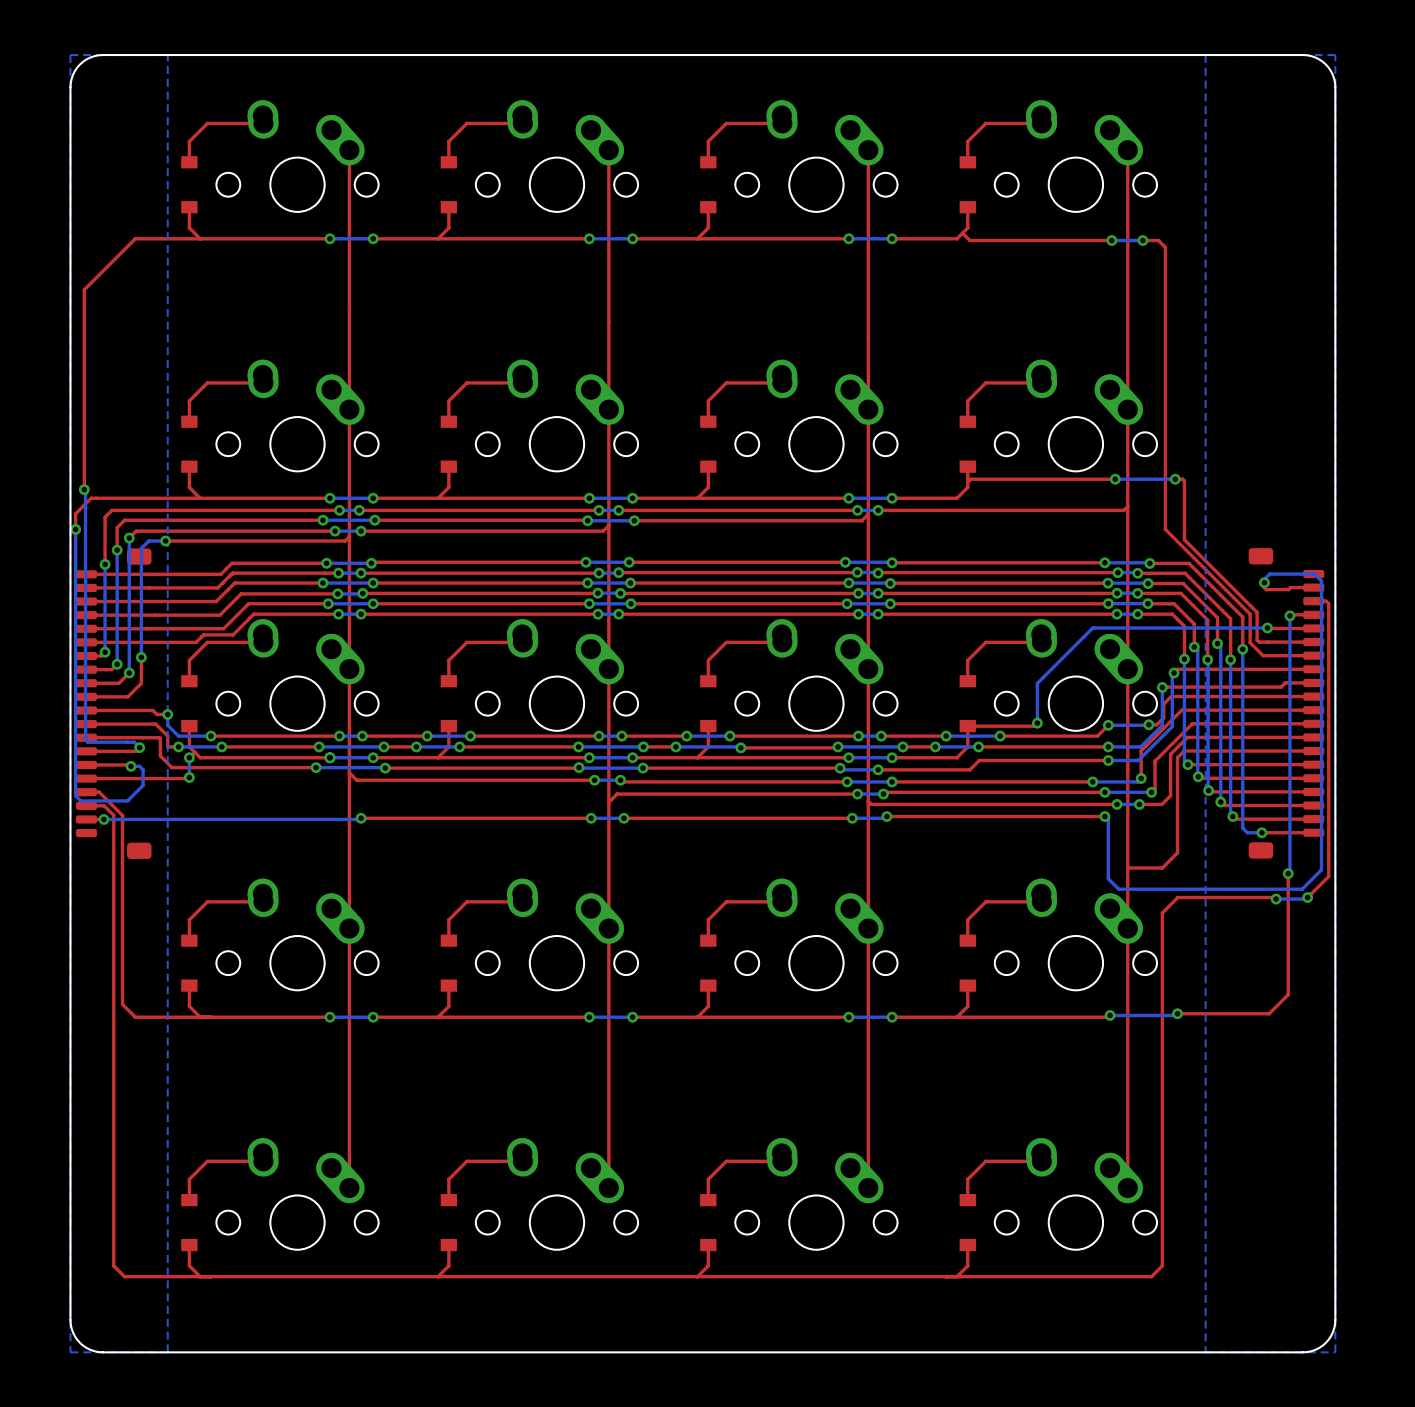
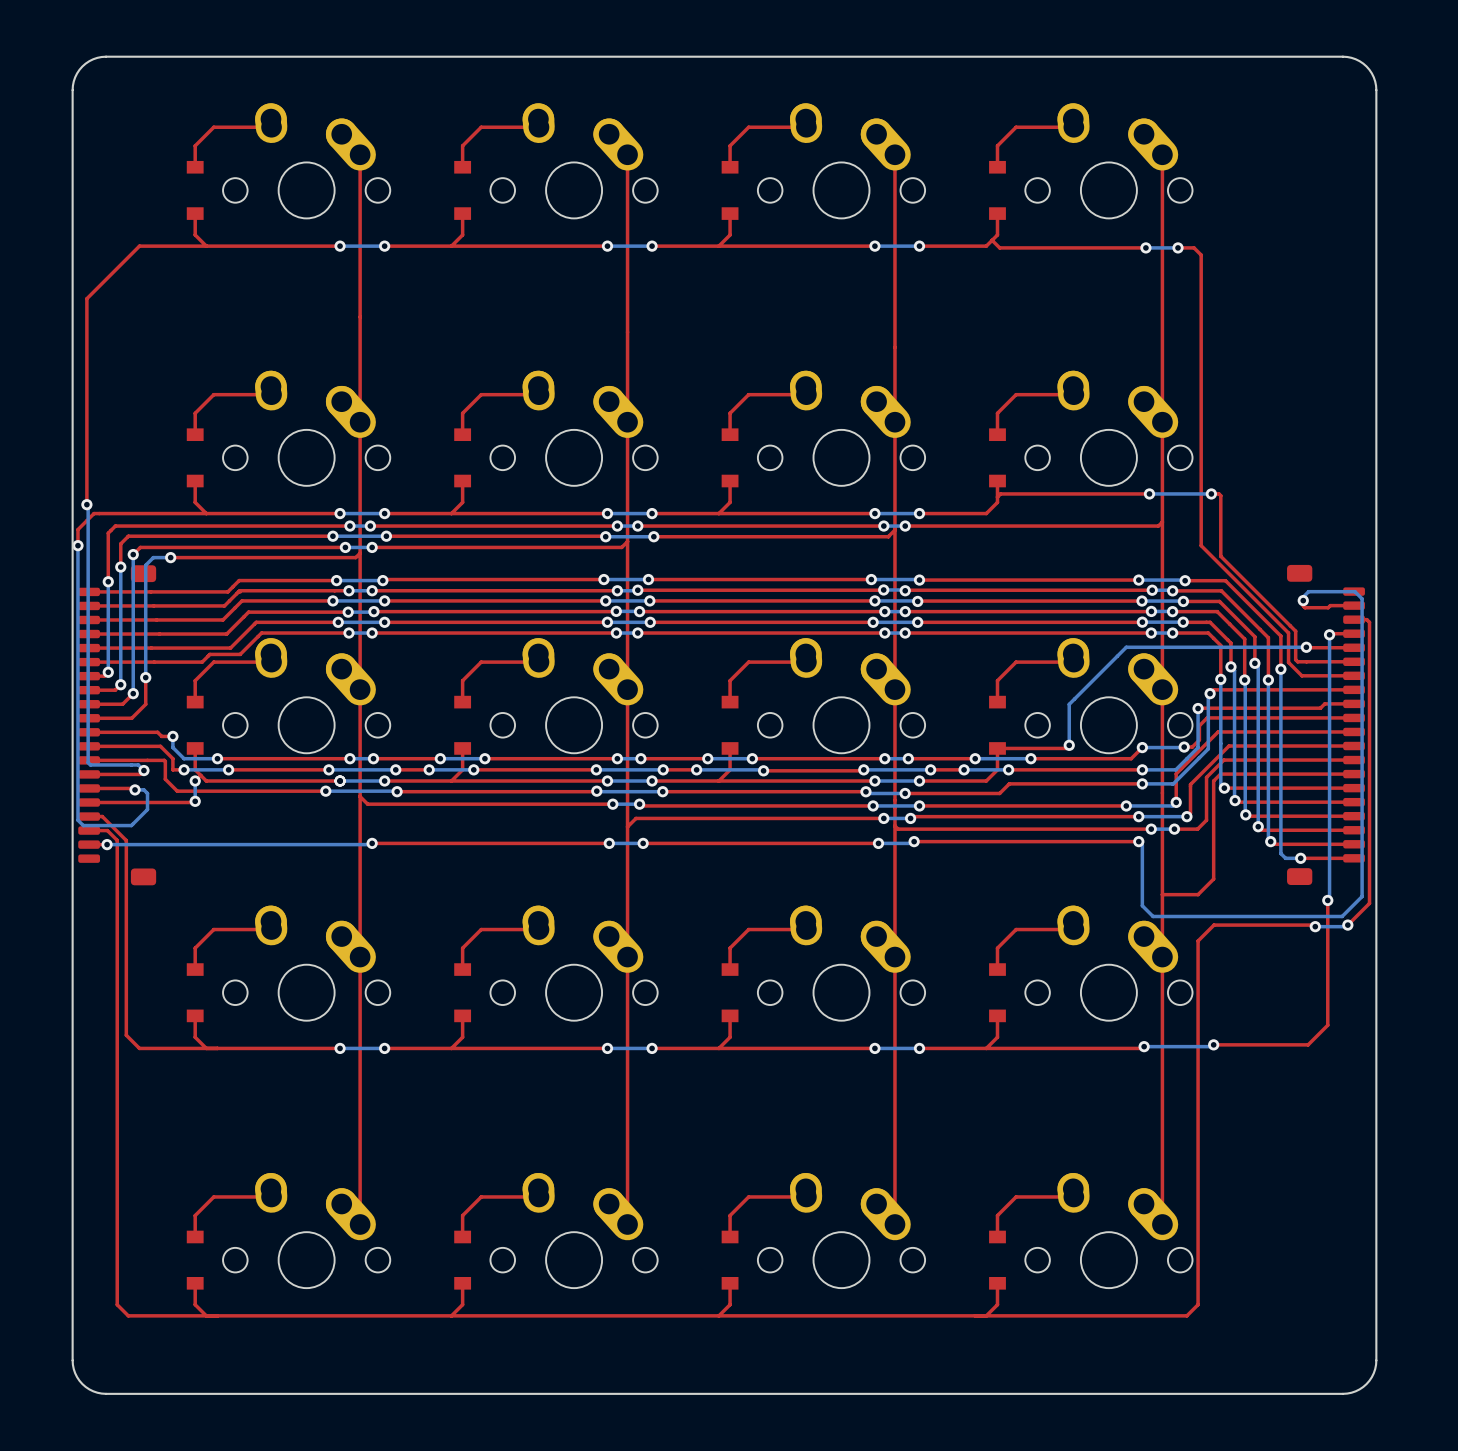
bottom zone outline: (167, 55) (167, 1352) (70, 1352) (70, 55) (167, 55) -> none
bottom zone outline: (1335, 55) (1205, 55) (1205, 1352) (1335, 1352) (1335, 55) -> none

